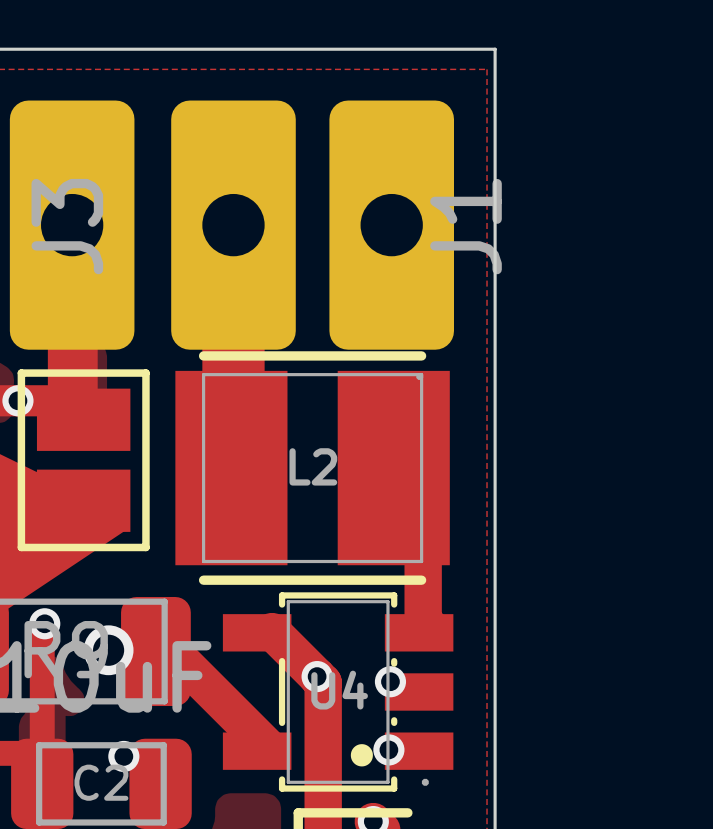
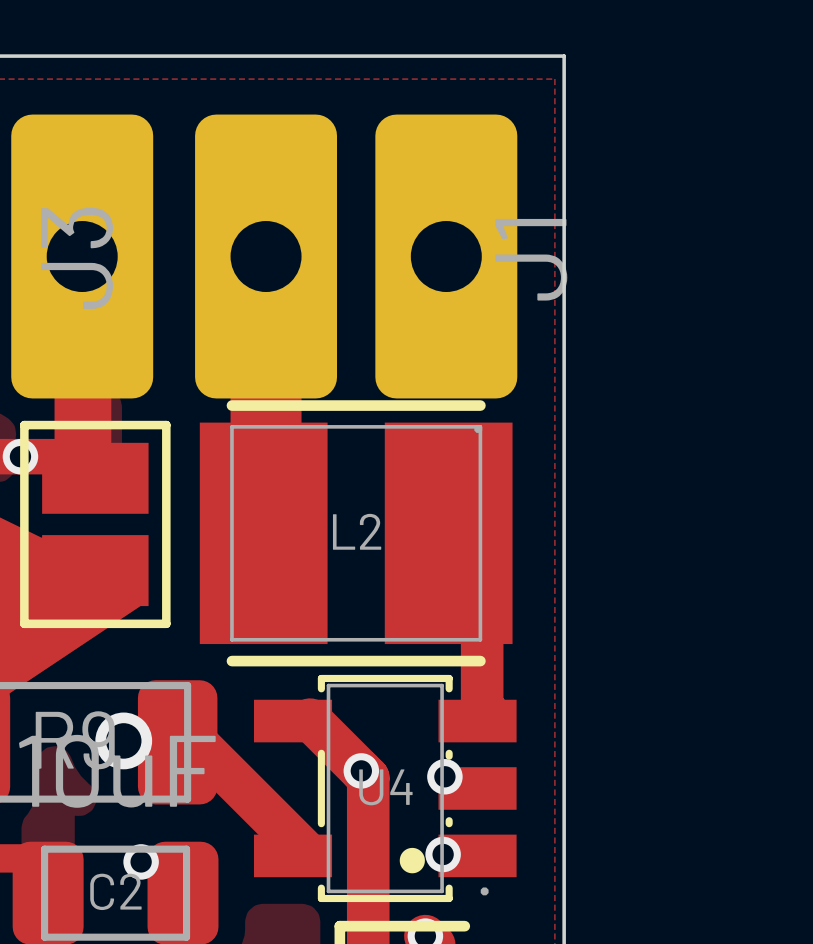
track: (44, 623) (42, 626) (42, 753) -> none
via: (44, 623) -> none

